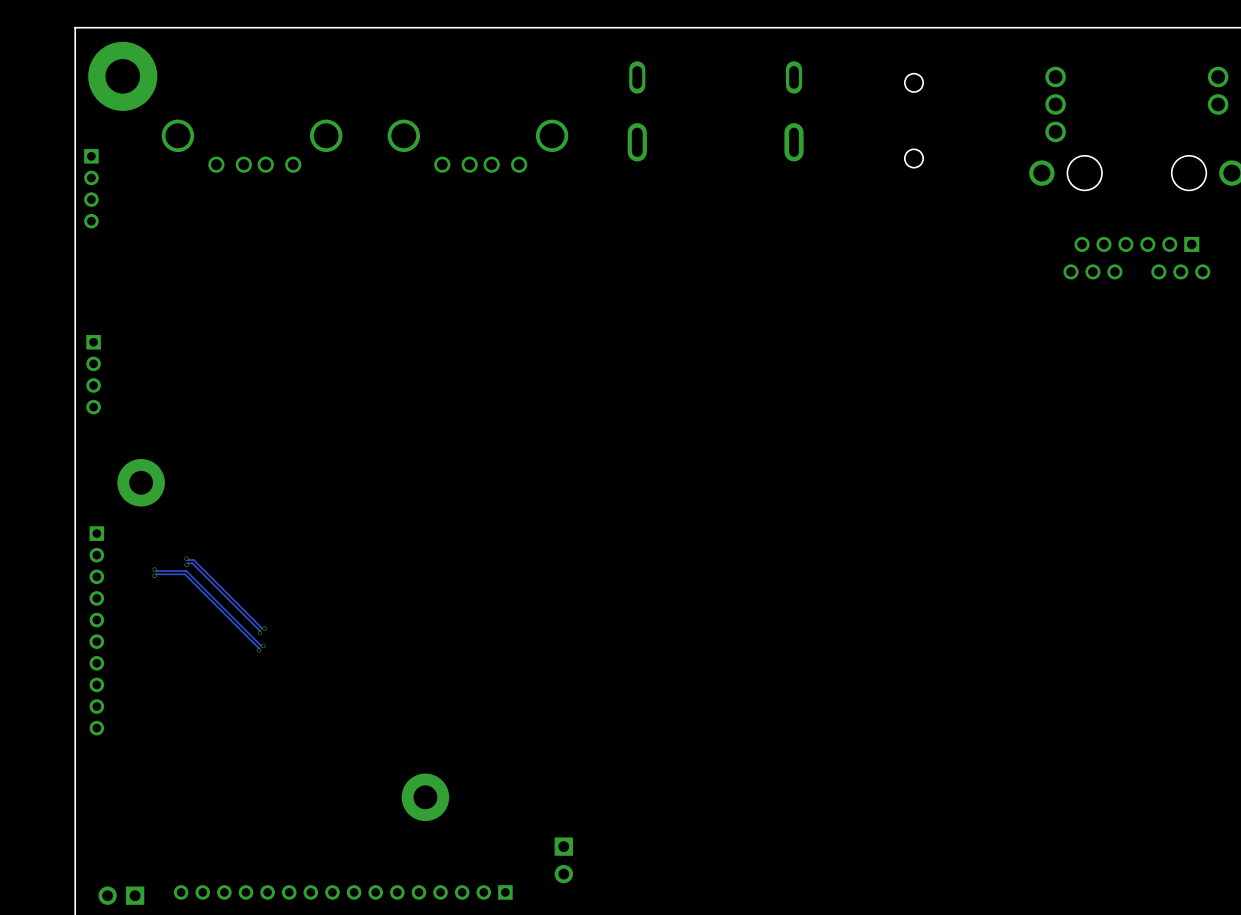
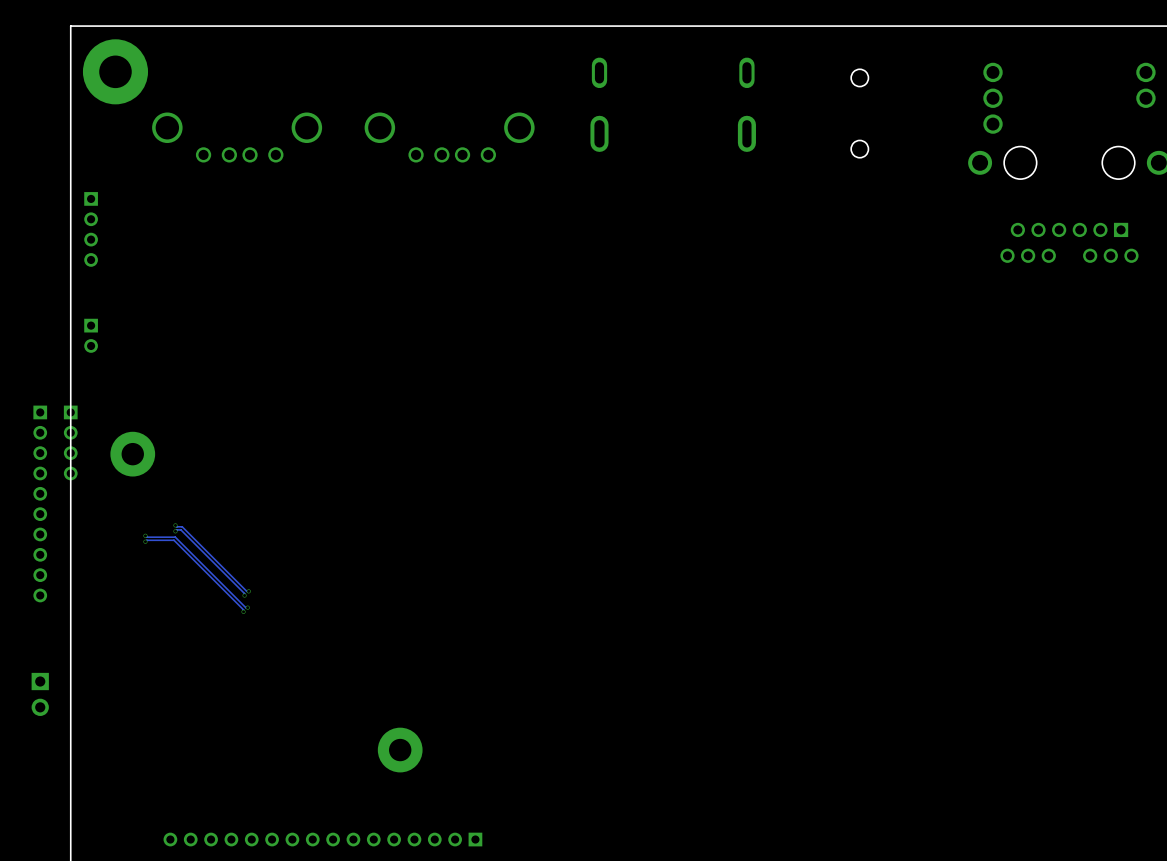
part position: (91, 188) -> (91, 229)
part: none -> (91, 335)
part: (93, 374) -> none
part: none -> (70, 442)
part position: (96, 630) -> (40, 503)
part: (563, 860) -> none
part rotation: 0° (121, 895) -> 90° counterclockwise (40, 694)
part position: (121, 895) -> (40, 694)

